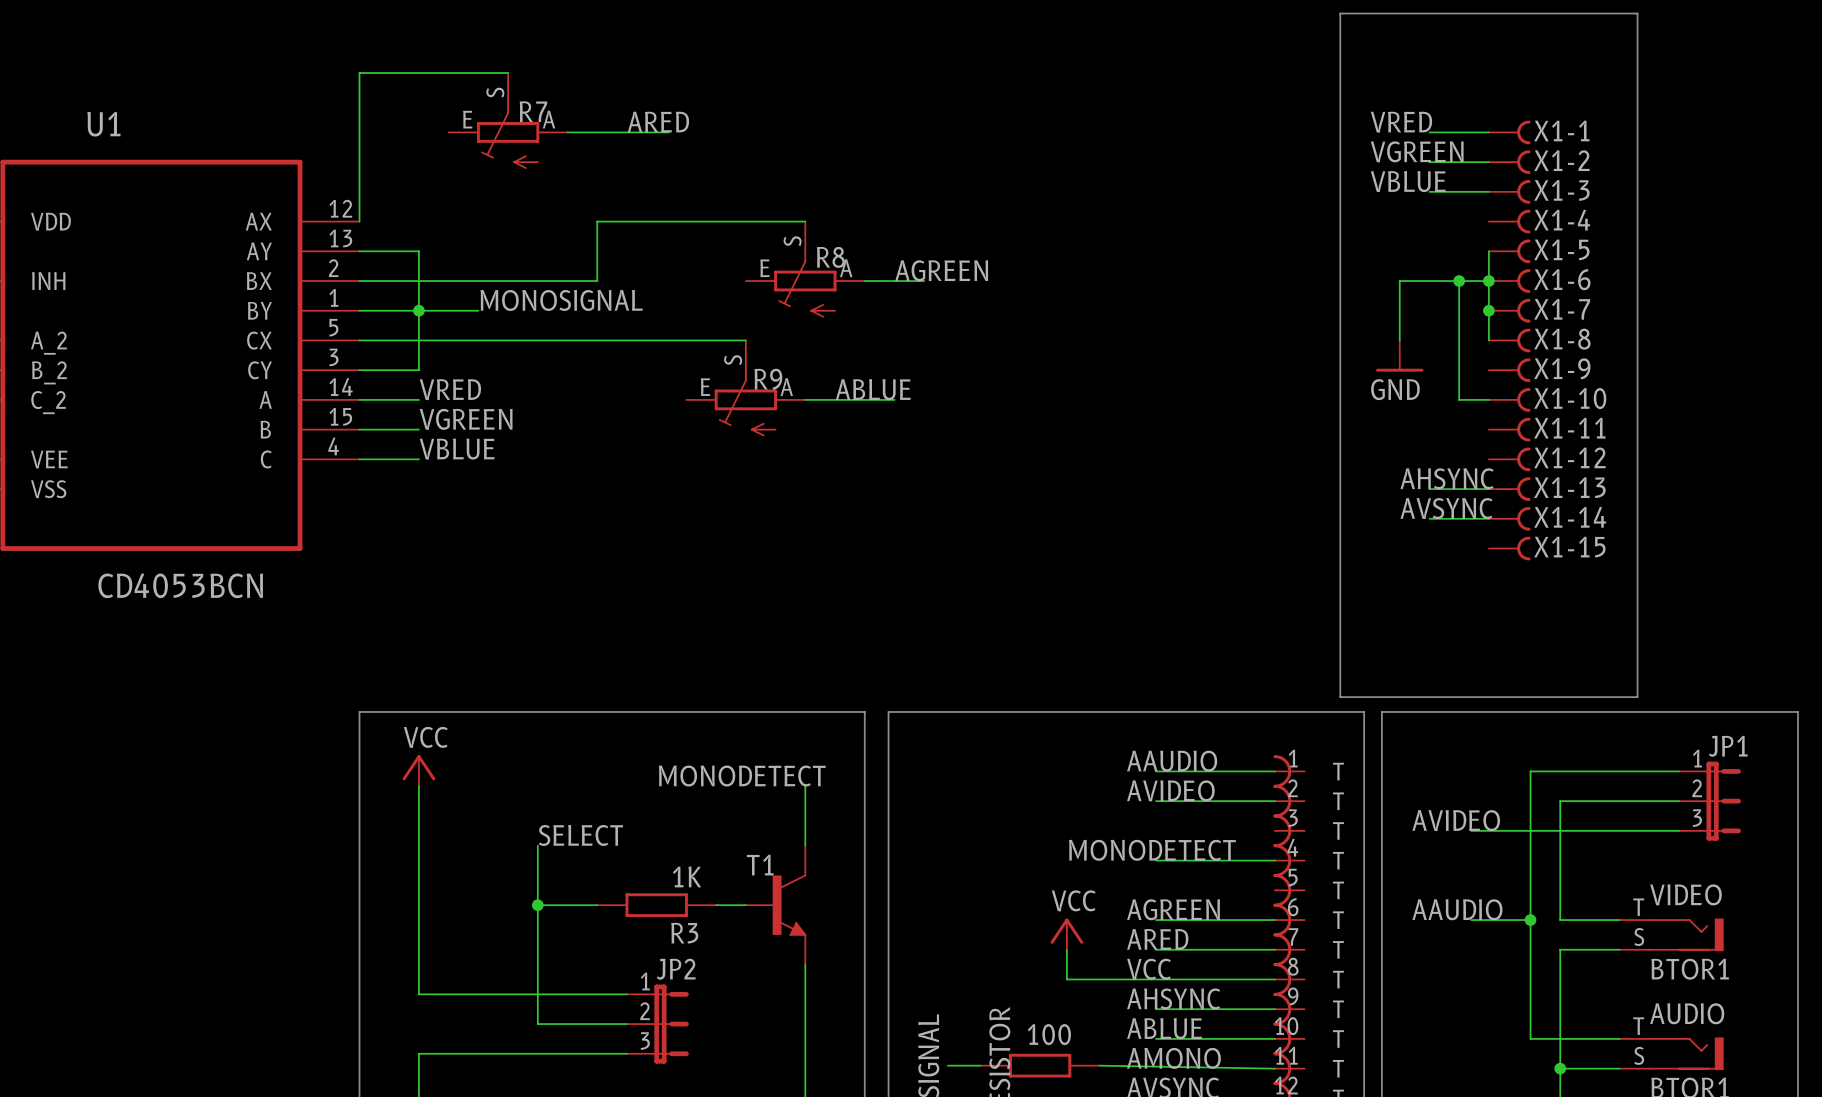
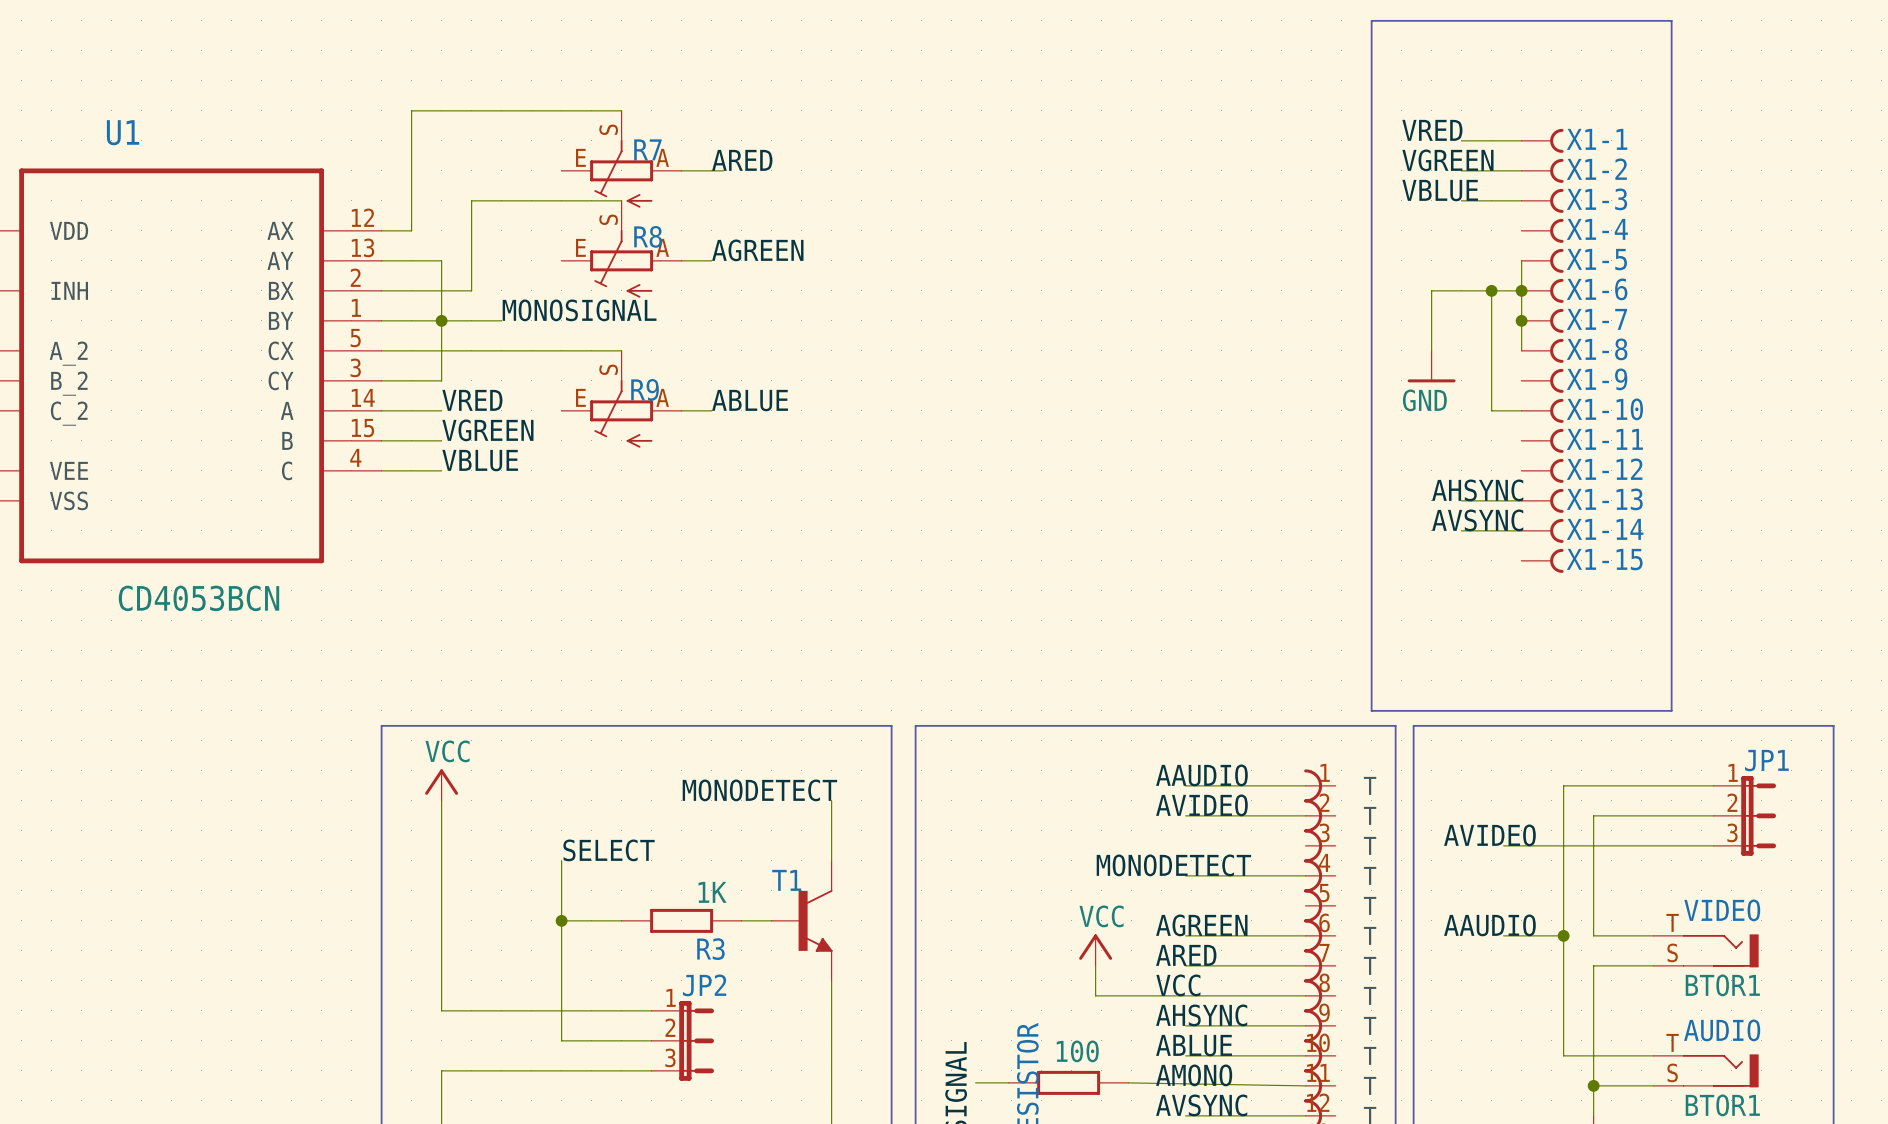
wire: (508, 72) (359, 72) (359, 221) -> (621, 110) (411, 110) (411, 230) (381, 230)
R7 position: (508, 120) -> (621, 159)
label position: ARED (658, 122) -> ARED (742, 160)
wire: (567, 132) (668, 132) -> none
wire: none -> (681, 170) (723, 170)
wire: (805, 221) (597, 221) (597, 281) (448, 281) -> (621, 200) (471, 200) (471, 290)
wire: none -> (681, 260) (711, 260)
R8 position: (805, 269) -> (621, 249)
label position: AGREEN (941, 270) -> AGREEN (757, 250)
wire: (864, 281) (924, 281) -> none
wire: (597, 340) (745, 340) -> none
R9 position: (745, 388) -> (621, 399)
label position: ABLUE (873, 389) -> ABLUE (750, 400)
wire: none -> (681, 410) (711, 410)
wire: (805, 399) (894, 399) -> none

